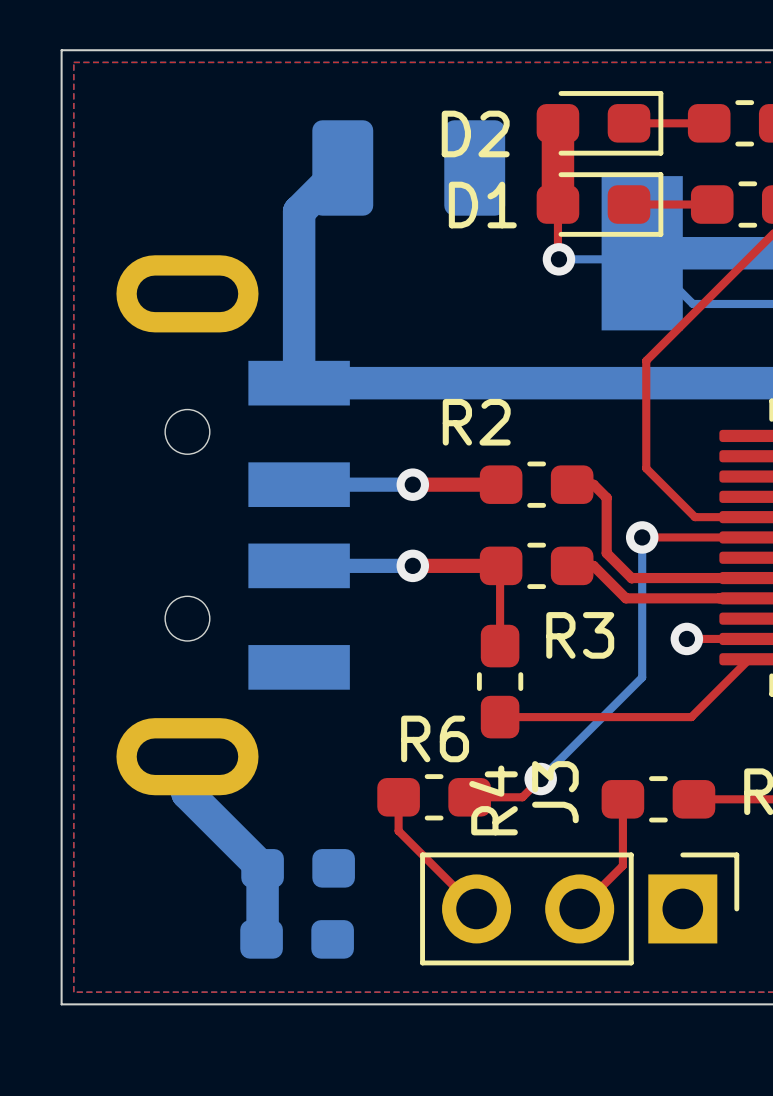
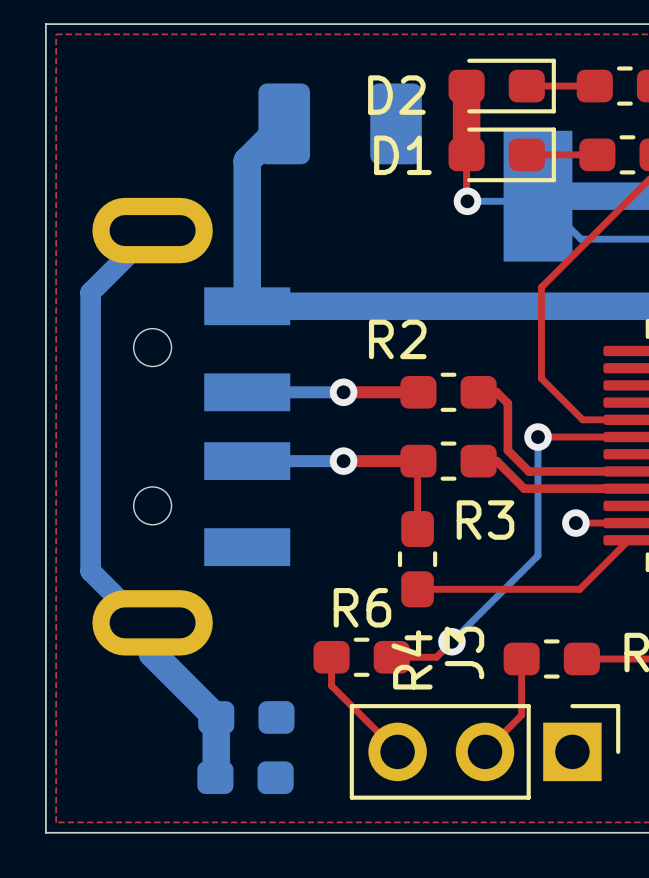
bottom track: none -> (152, 230) (90, 292) (90, 571) (142, 622) (152, 622) (121, 622)

